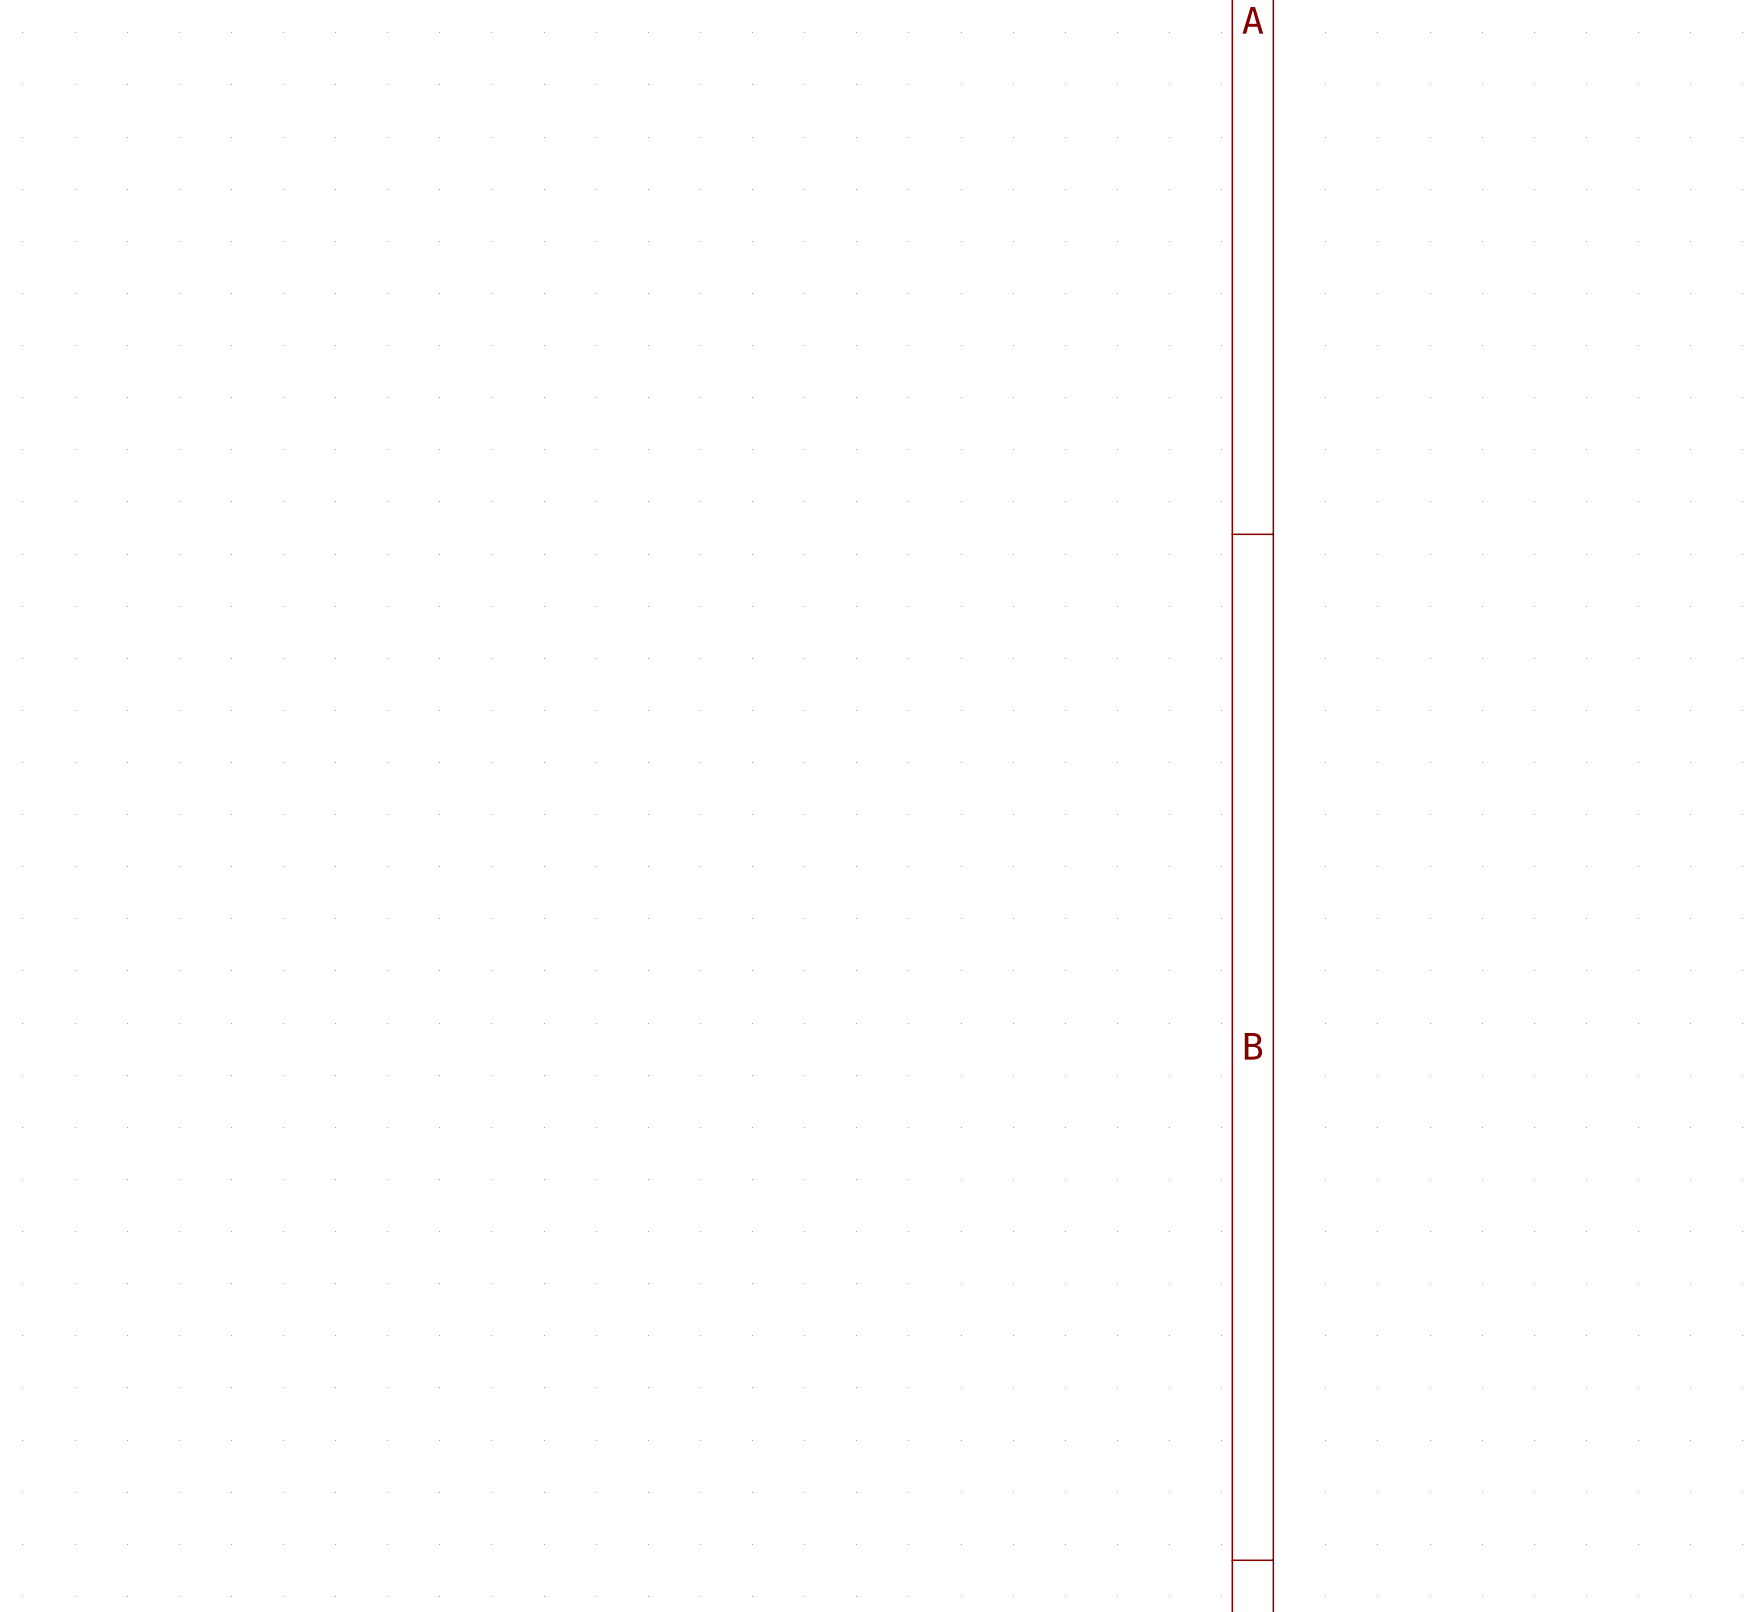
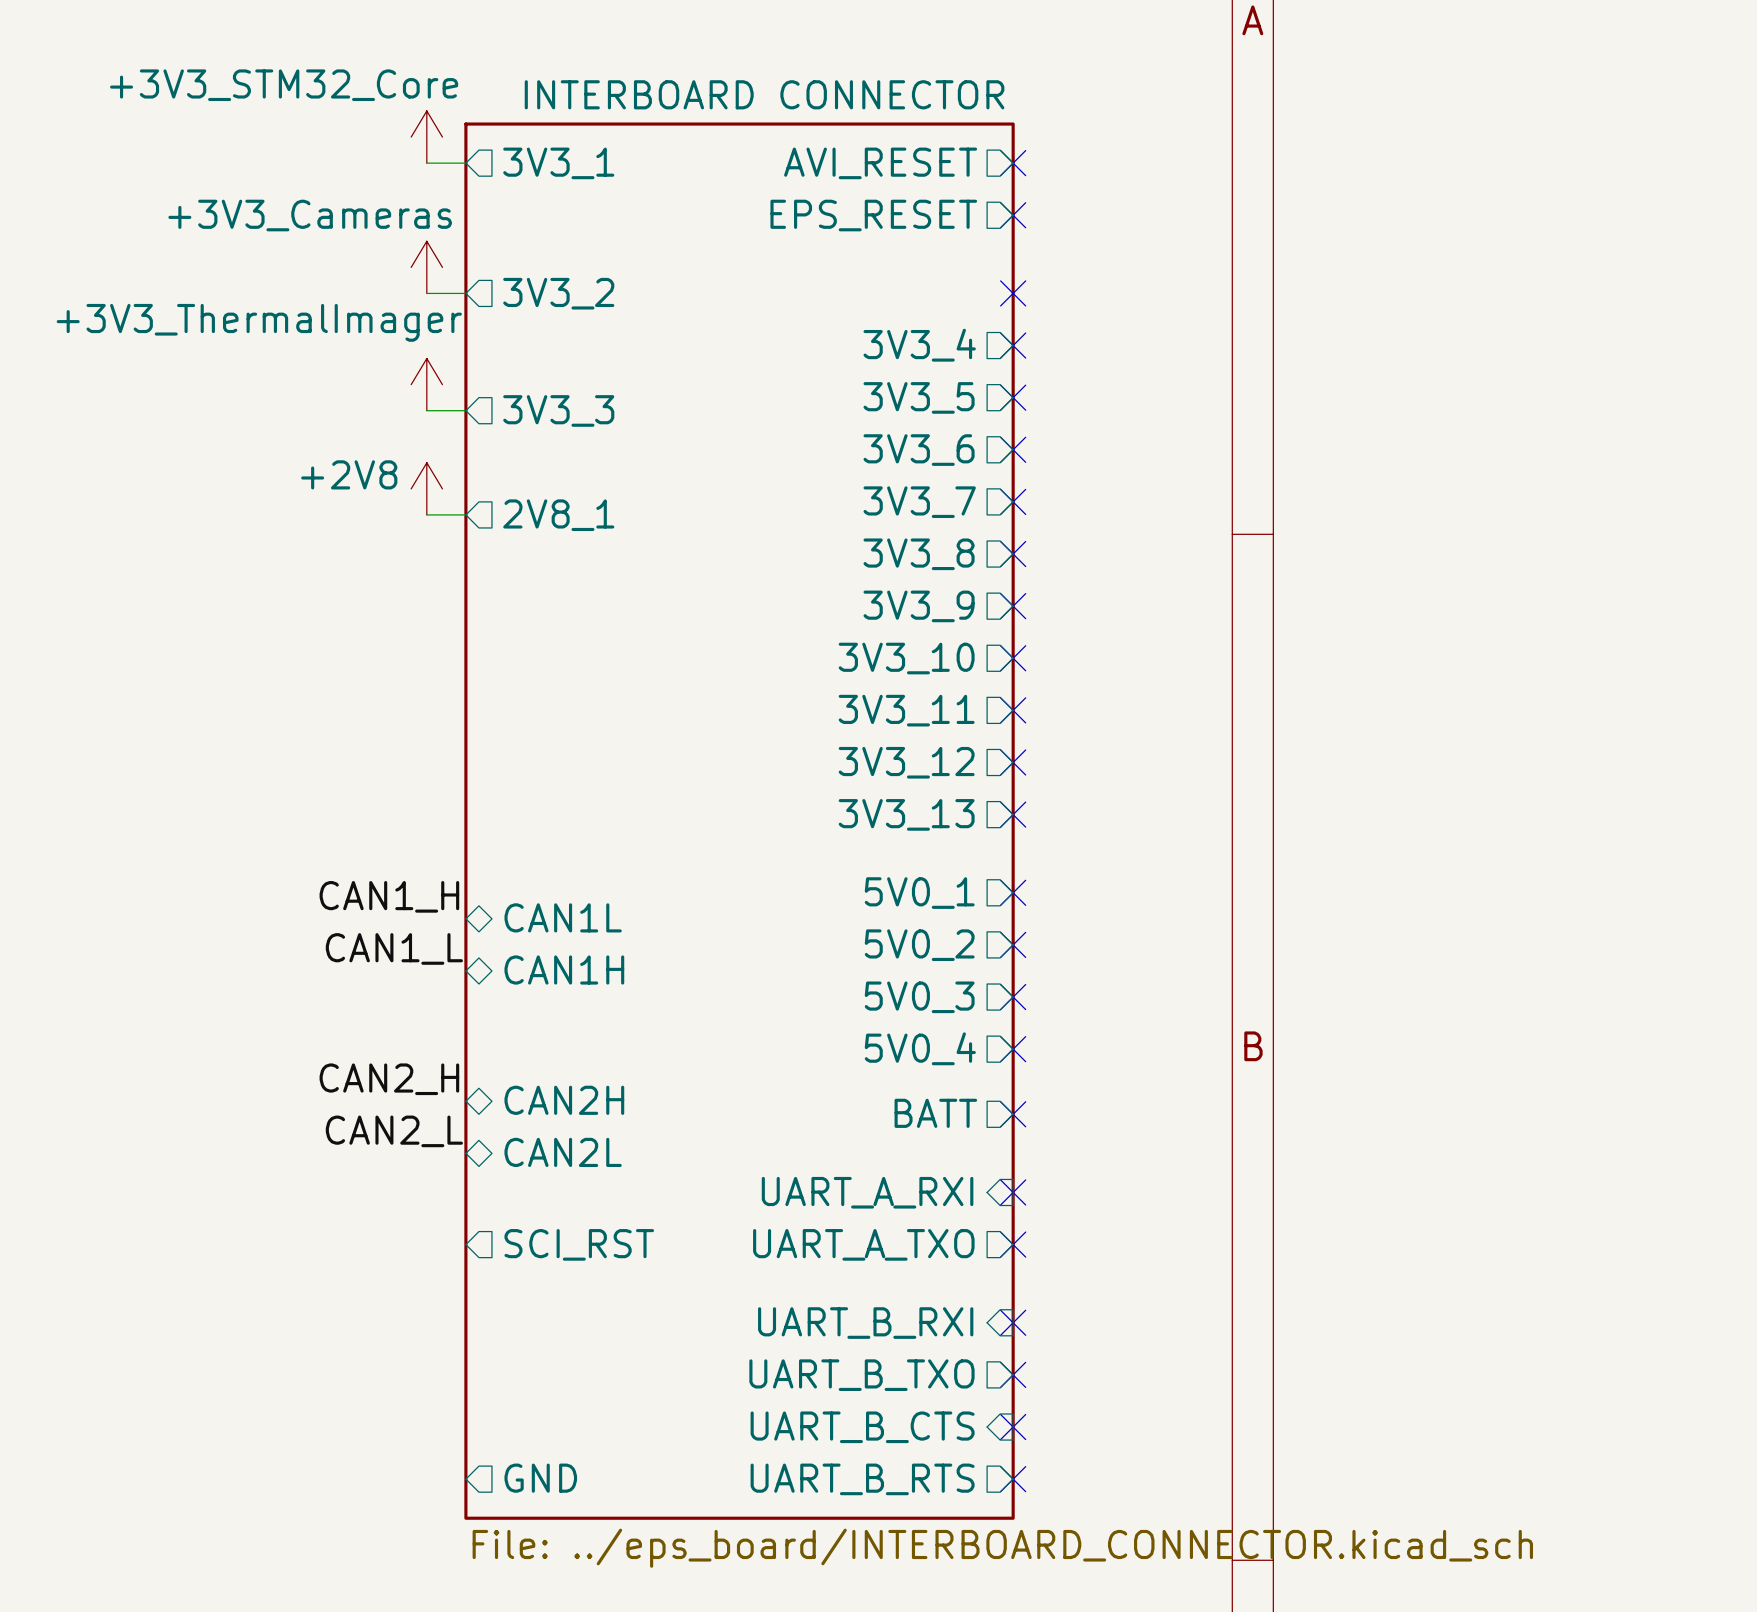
power symbol: none -> +3V3_STM32_Core (426, 137)
wire: none -> (426, 163) (465, 163)
no-connect mark: none -> (1013, 163)
sheet pin: none -> 3V3_1 (558, 163)
sheet pin: none -> AVI_RESET (880, 163)
no-connect mark: none -> (1013, 215)
sheet pin: none -> EPS_RESET (873, 215)
power symbol: none -> +3V3_Cameras (426, 267)
wire: none -> (426, 293) (465, 293)
no-connect mark: none -> (1013, 293)
sheet pin: none -> 3V3_2 (558, 293)
no-connect mark: none -> (1013, 345)
sheet pin: none -> 3V3_4 (919, 345)
power symbol: none -> +3V3_ThermalImager (426, 384)
no-connect mark: none -> (1013, 397)
sheet pin: none -> 3V3_5 (919, 397)
wire: none -> (426, 410) (465, 410)
sheet pin: none -> 3V3_3 (558, 410)
no-connect mark: none -> (1013, 449)
sheet pin: none -> 3V3_6 (919, 450)
power symbol: none -> +2V8 (426, 488)
no-connect mark: none -> (1013, 501)
sheet pin: none -> 3V3_7 (919, 502)
wire: none -> (426, 514) (465, 514)
sheet pin: none -> 2V8_1 (558, 515)
no-connect mark: none -> (1013, 554)
sheet pin: none -> 3V3_8 (919, 554)
no-connect mark: none -> (1013, 606)
sheet pin: none -> 3V3_9 (919, 606)
no-connect mark: none -> (1013, 658)
sheet pin: none -> 3V3_10 (906, 658)
no-connect mark: none -> (1013, 710)
sheet pin: none -> 3V3_11 (906, 710)
no-connect mark: none -> (1013, 762)
sheet pin: none -> 3V3_12 (906, 762)
no-connect mark: none -> (1013, 814)
sheet pin: none -> 3V3_13 (906, 814)
sheet INTERBOARD CONNECTOR: none -> File: ../eps_board/INTERBOARD_CONNECTOR.kicad_sch (739, 821)
no-connect mark: none -> (1013, 892)
sheet pin: none -> 5V0_1 (919, 893)
label: none -> CAN1_H (389, 896)
sheet pin: none -> CAN1L (563, 917)
no-connect mark: none -> (1013, 944)
sheet pin: none -> 5V0_2 (919, 945)
label: none -> CAN1_L (394, 948)
sheet pin: none -> CAN1H (564, 970)
no-connect mark: none -> (1013, 997)
sheet pin: none -> 5V0_3 (919, 997)
no-connect mark: none -> (1013, 1049)
sheet pin: none -> 5V0_4 (920, 1048)
label: none -> CAN2_H (389, 1079)
sheet pin: none -> CAN2H (564, 1100)
sheet pin: none -> BATT (935, 1113)
no-connect mark: none -> (1013, 1114)
label: none -> CAN2_L (394, 1131)
sheet pin: none -> CAN2L (563, 1152)
no-connect mark: none -> (1013, 1192)
sheet pin: none -> UART_A_RXI (867, 1192)
no-connect mark: none -> (1013, 1244)
sheet pin: none -> SCI_RST (579, 1244)
sheet pin: none -> UART_A_TXO (863, 1244)
no-connect mark: none -> (1013, 1322)
sheet pin: none -> UART_B_RXI (865, 1323)
no-connect mark: none -> (1013, 1374)
sheet pin: none -> UART_B_TXO (861, 1375)
no-connect mark: none -> (1013, 1427)
sheet pin: none -> UART_B_CTS (862, 1427)
sheet pin: none -> GND (540, 1478)
no-connect mark: none -> (1013, 1479)
sheet pin: none -> UART_B_RTS (862, 1479)

